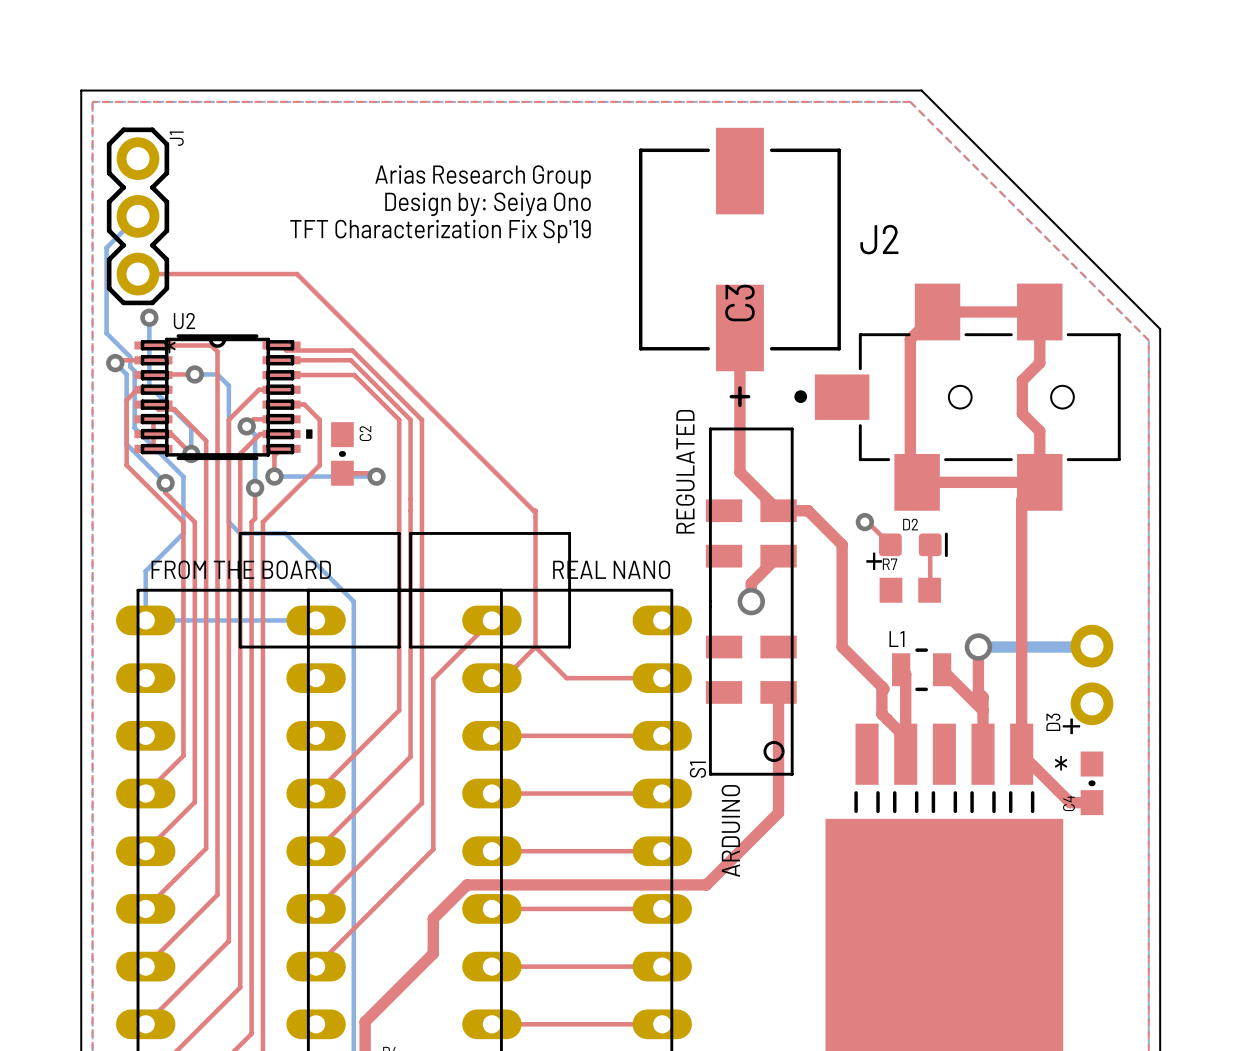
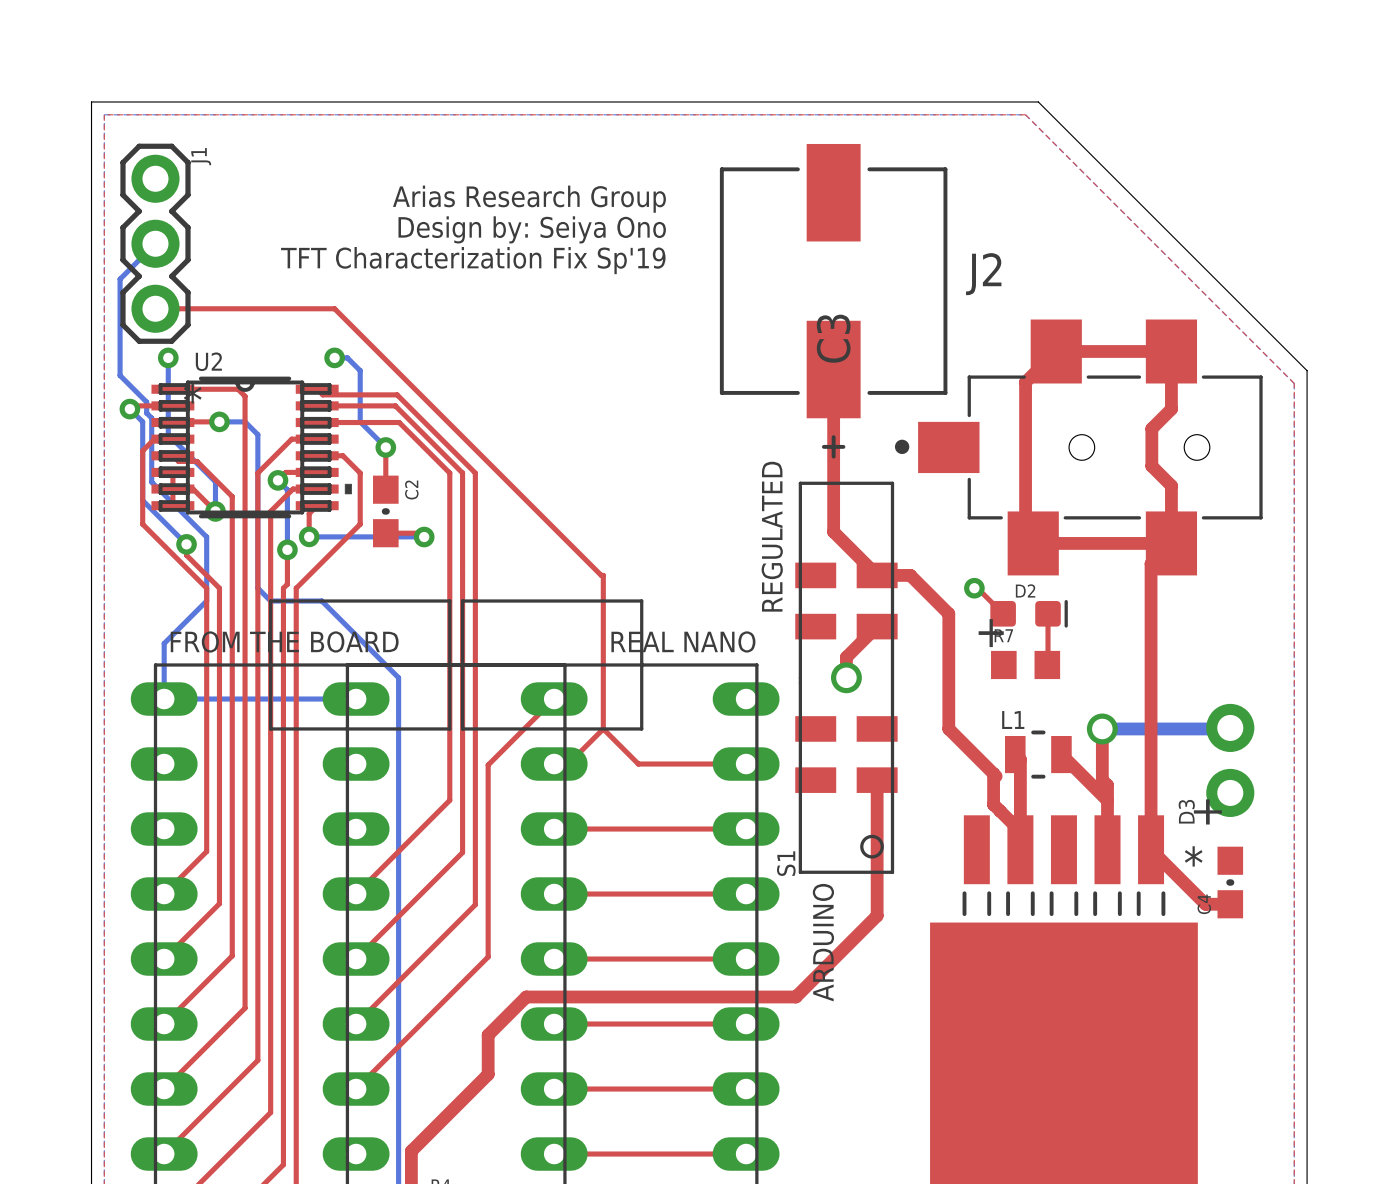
bottom track: none -> (334, 357) (347, 357) (360, 370) (360, 421) (385, 447)
via: none -> (334, 357)
top track: none -> (385, 447) (385, 489)
via: none -> (385, 447)

